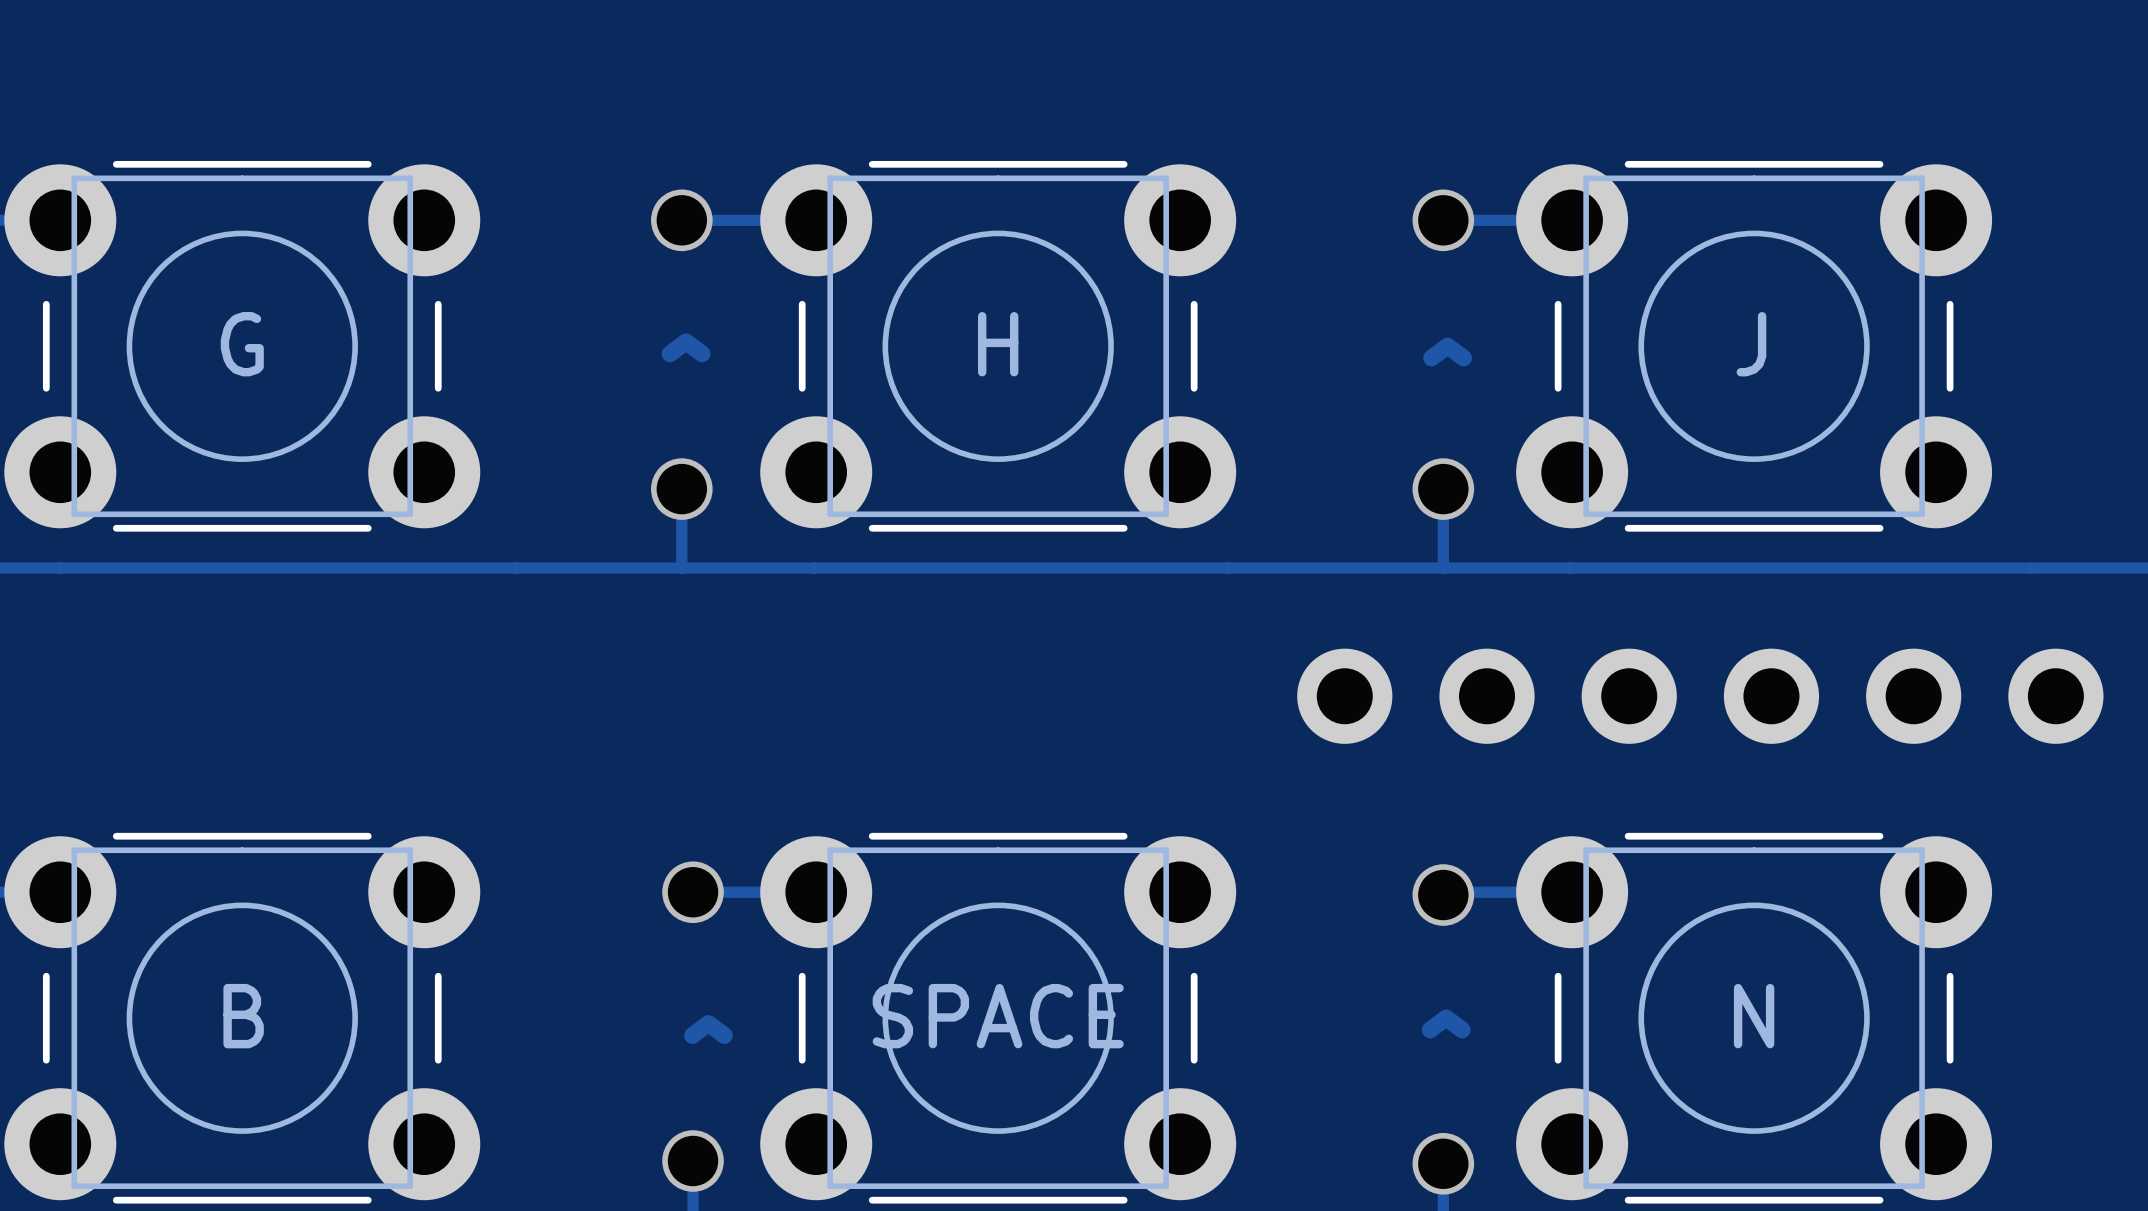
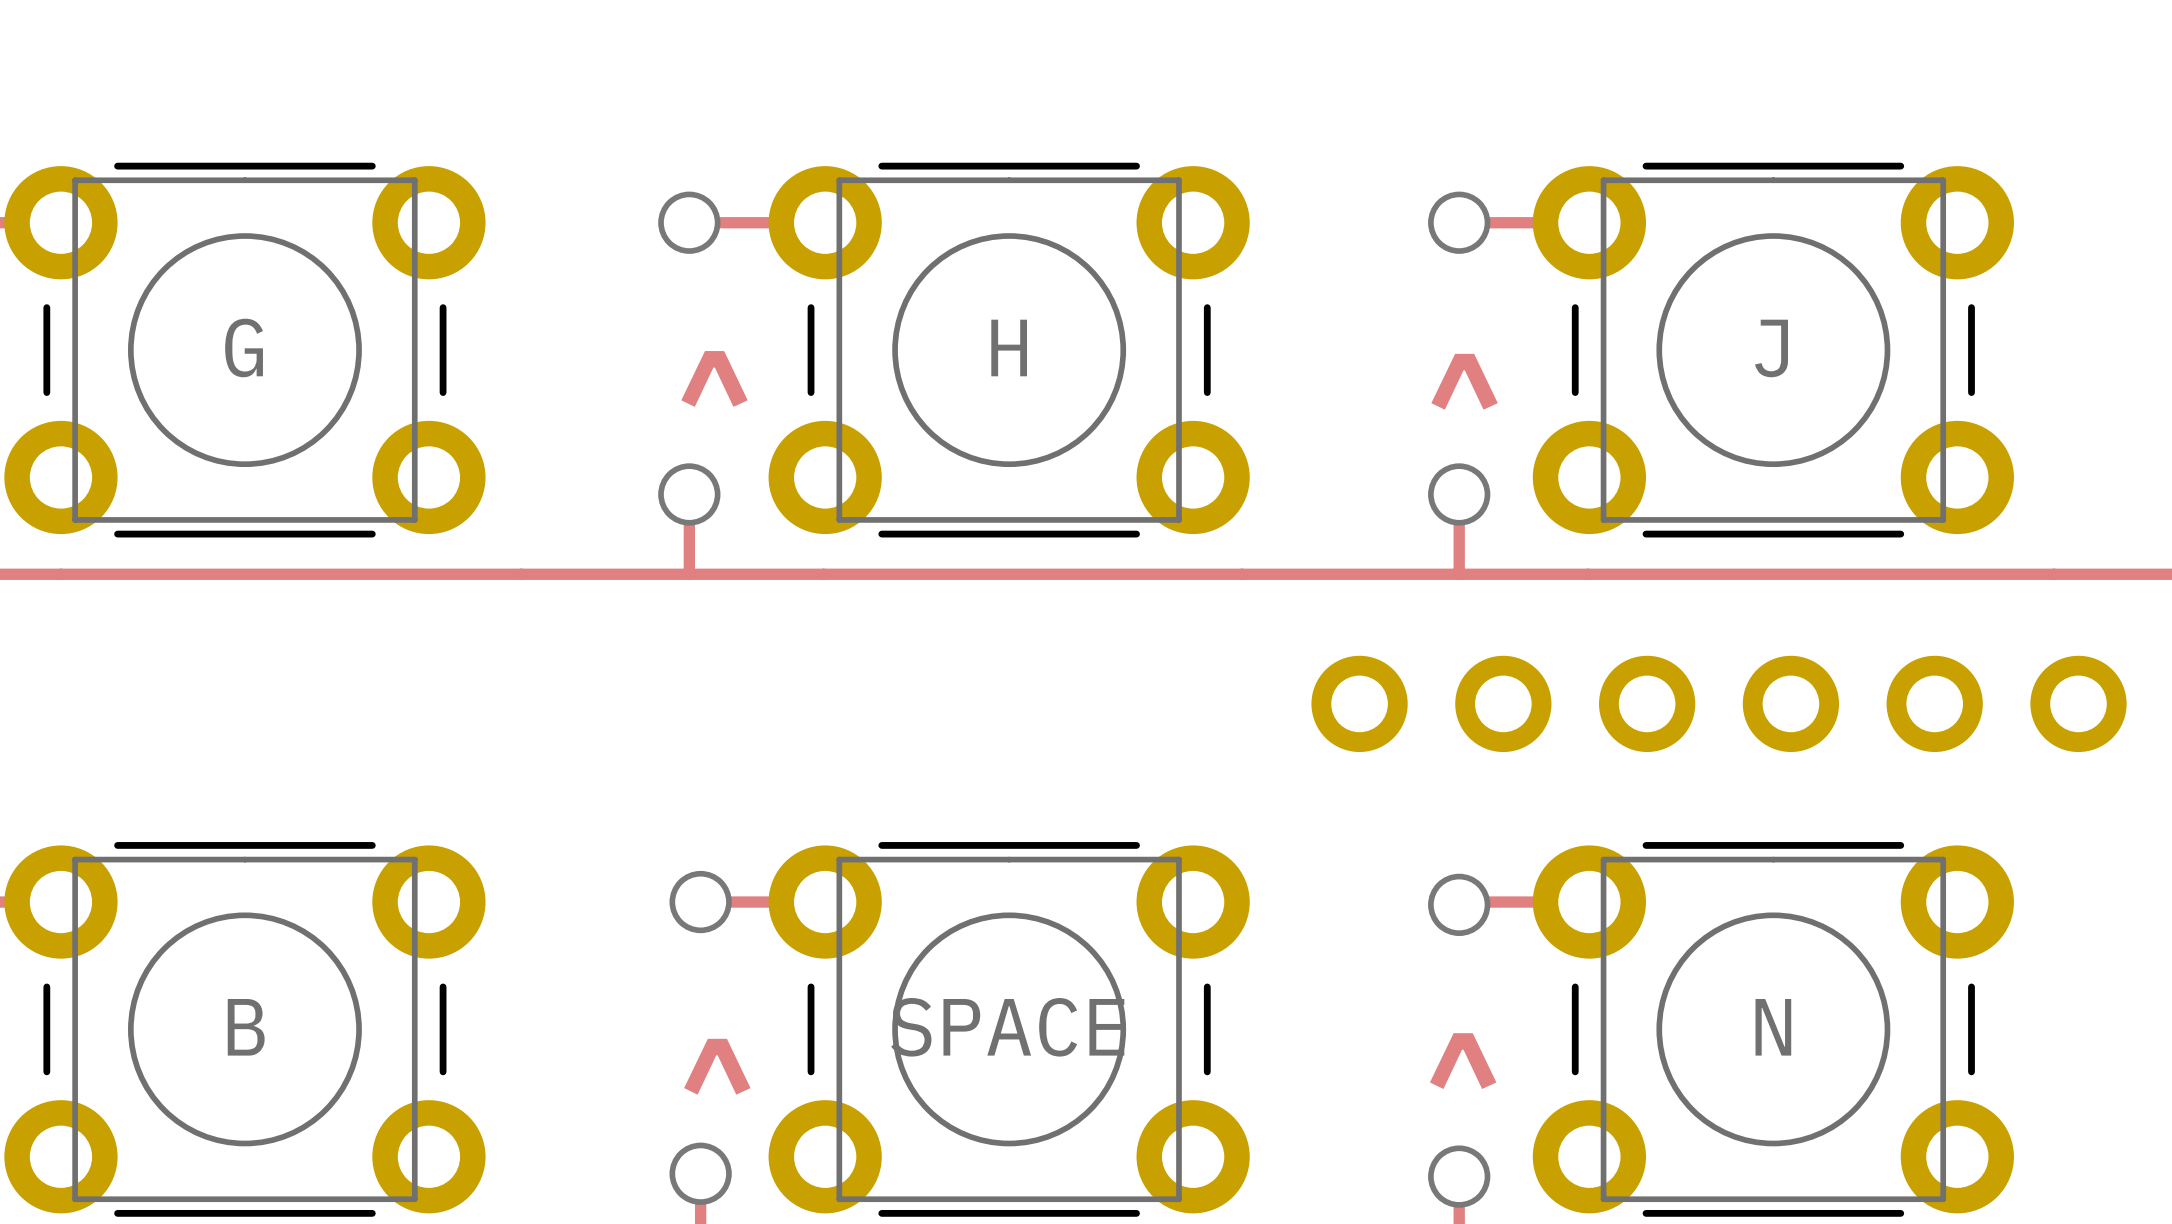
text position: ^ (686, 347) -> ^ (714, 378)

